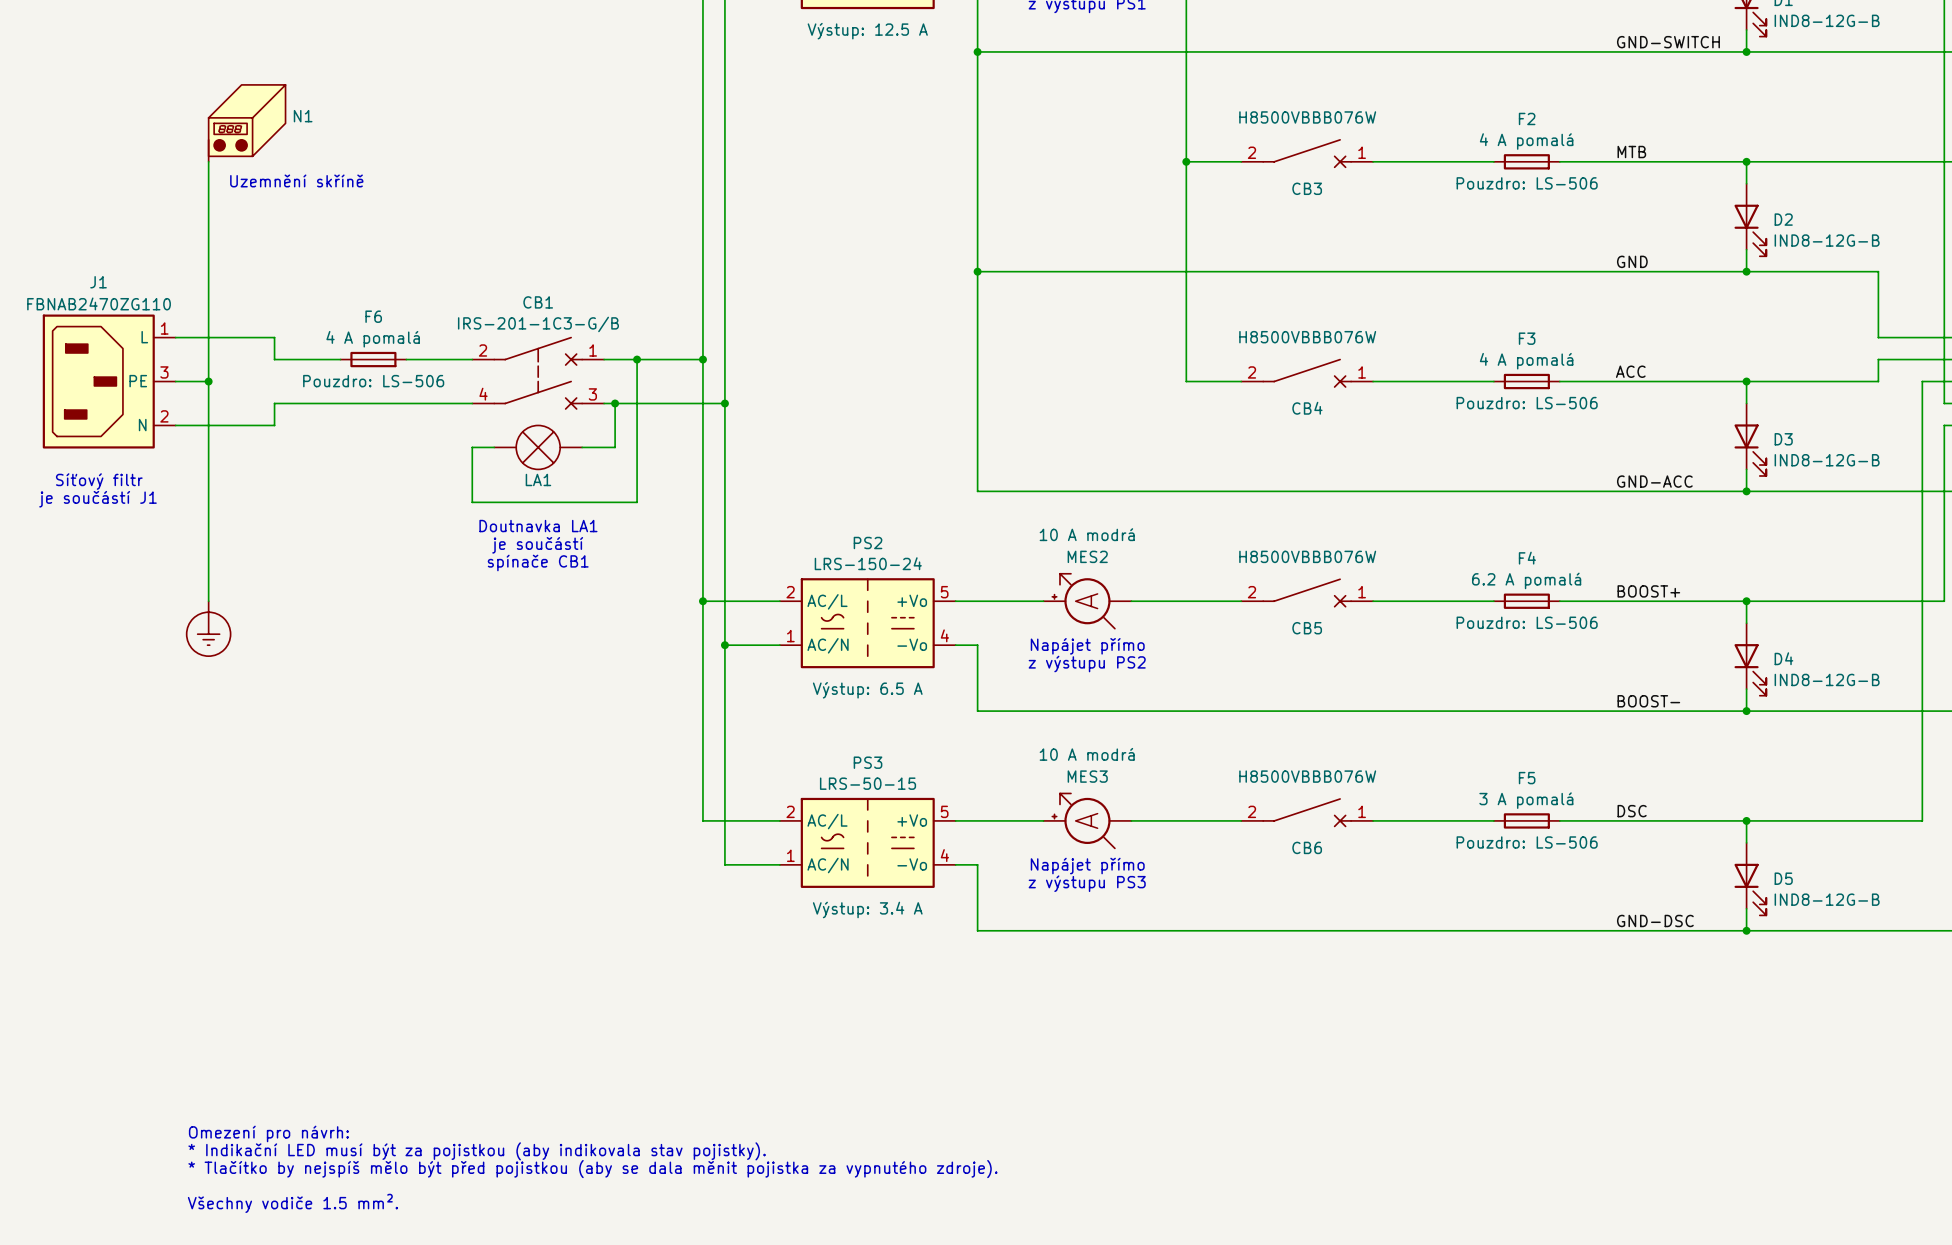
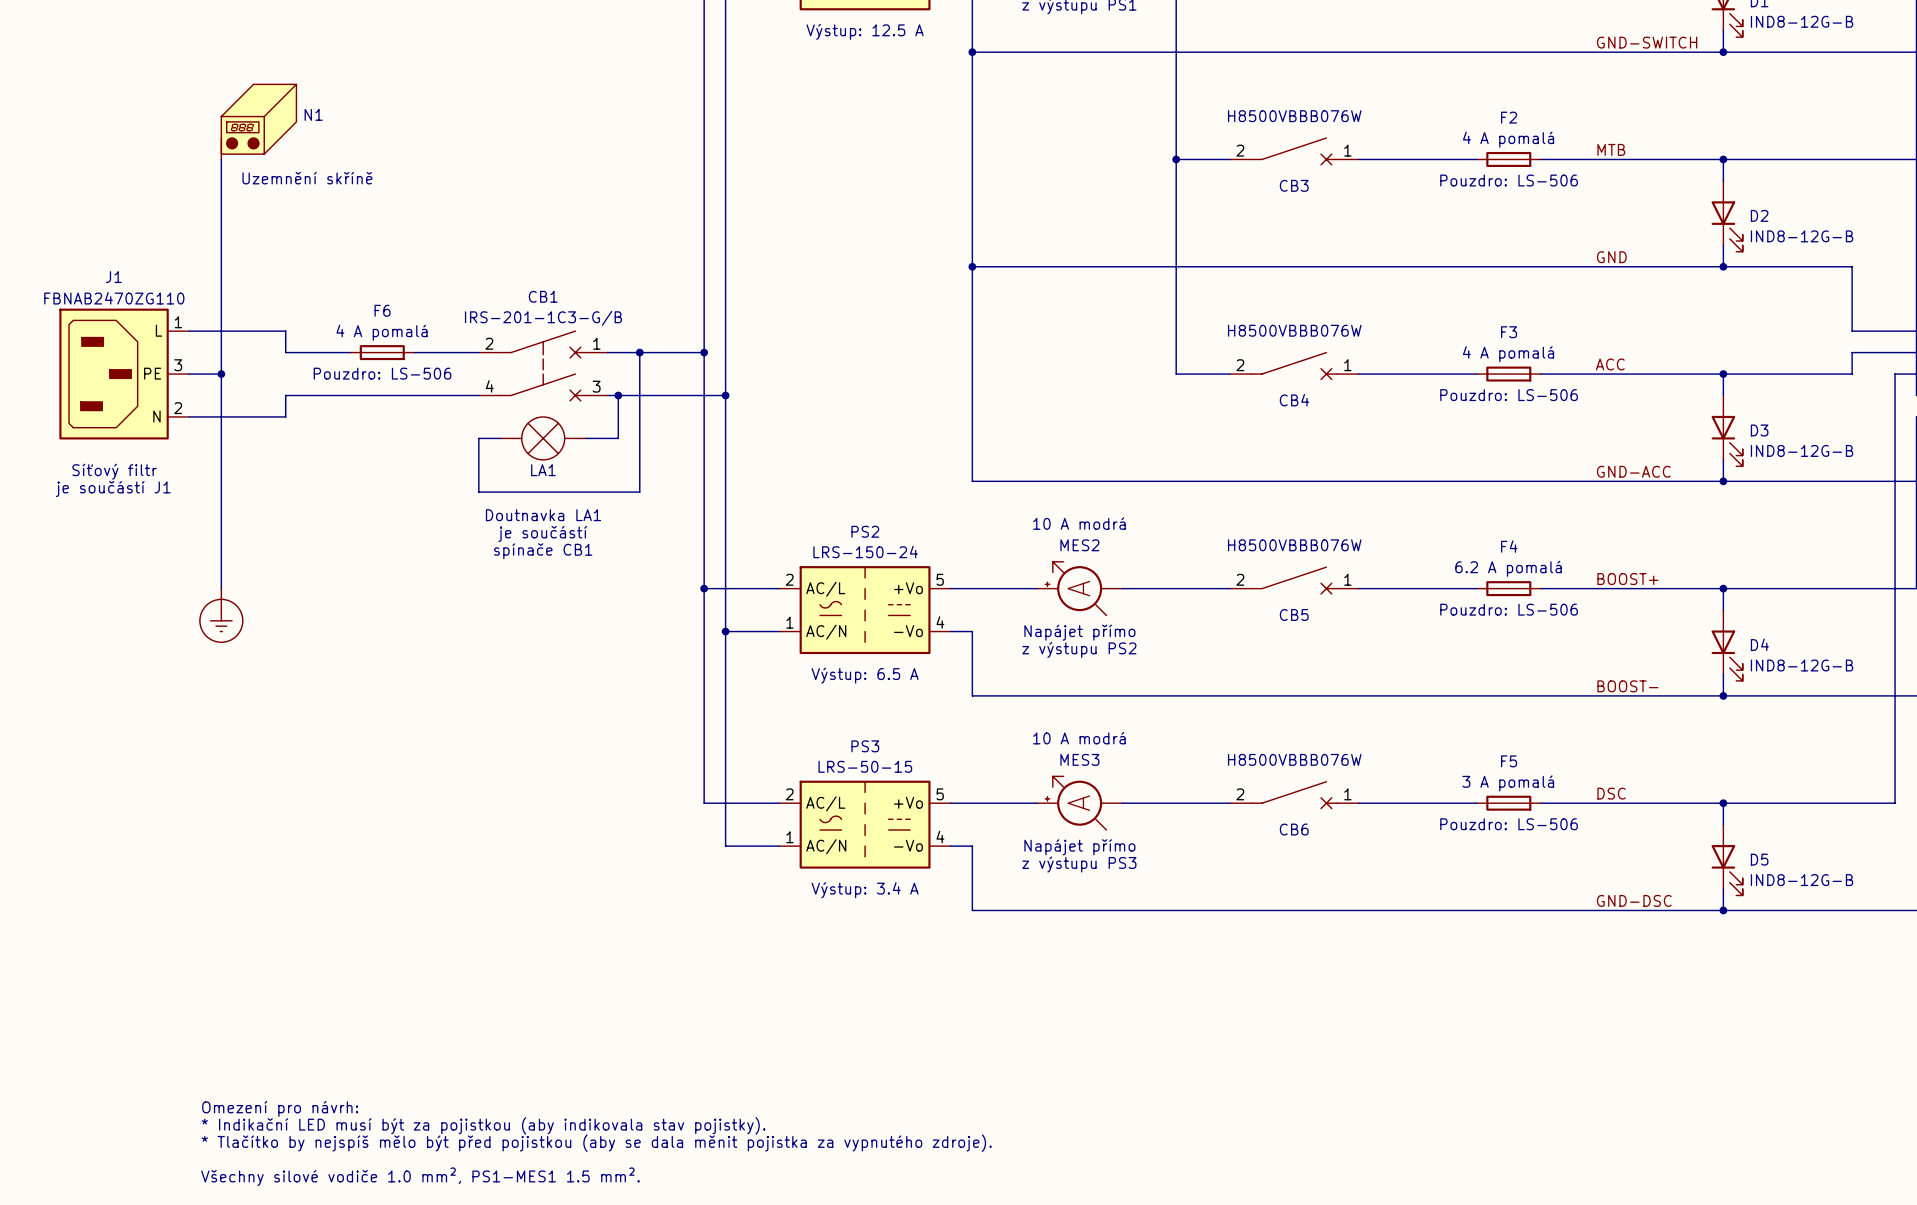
text: Všechny vodiče 1.5 mm². (292, 1203) -> Všechny silové vodiče 1.0 mm², PS1-MES1 1.5 mm². (420, 1176)

